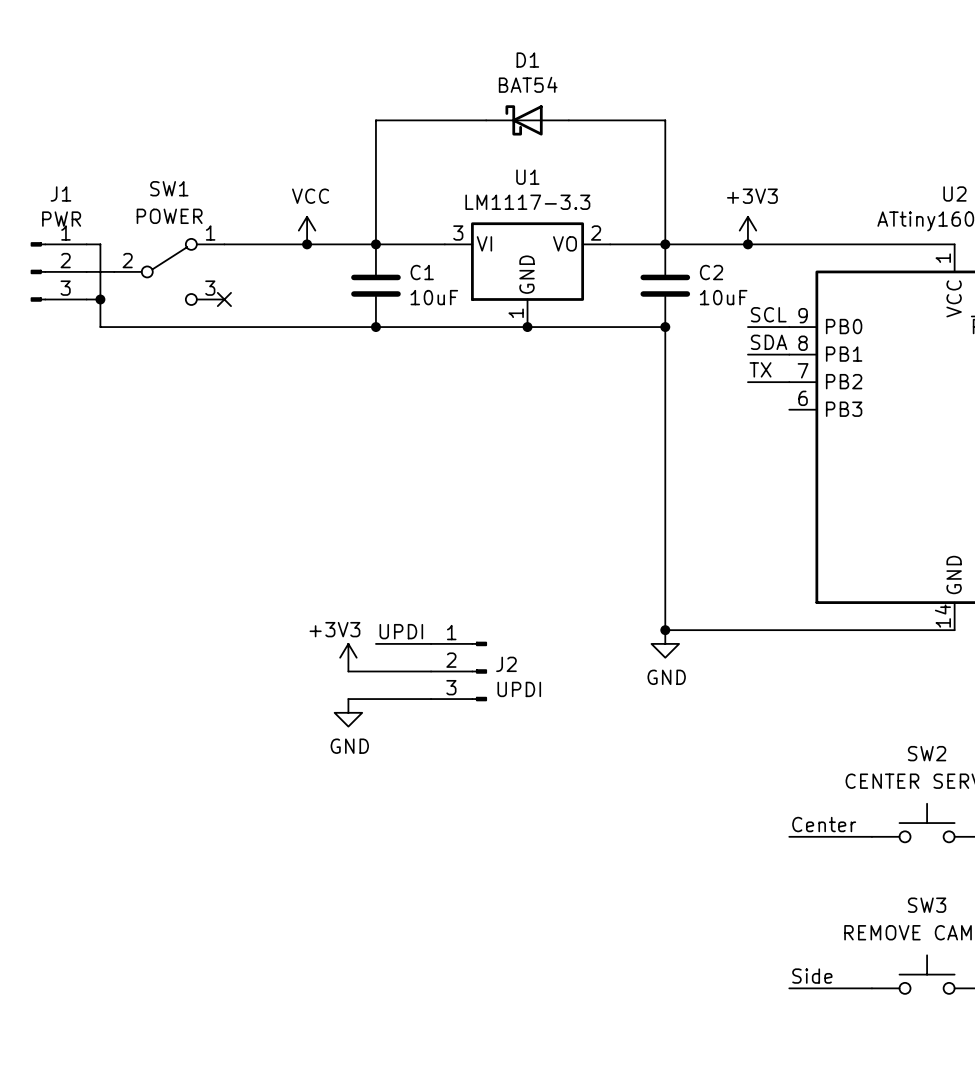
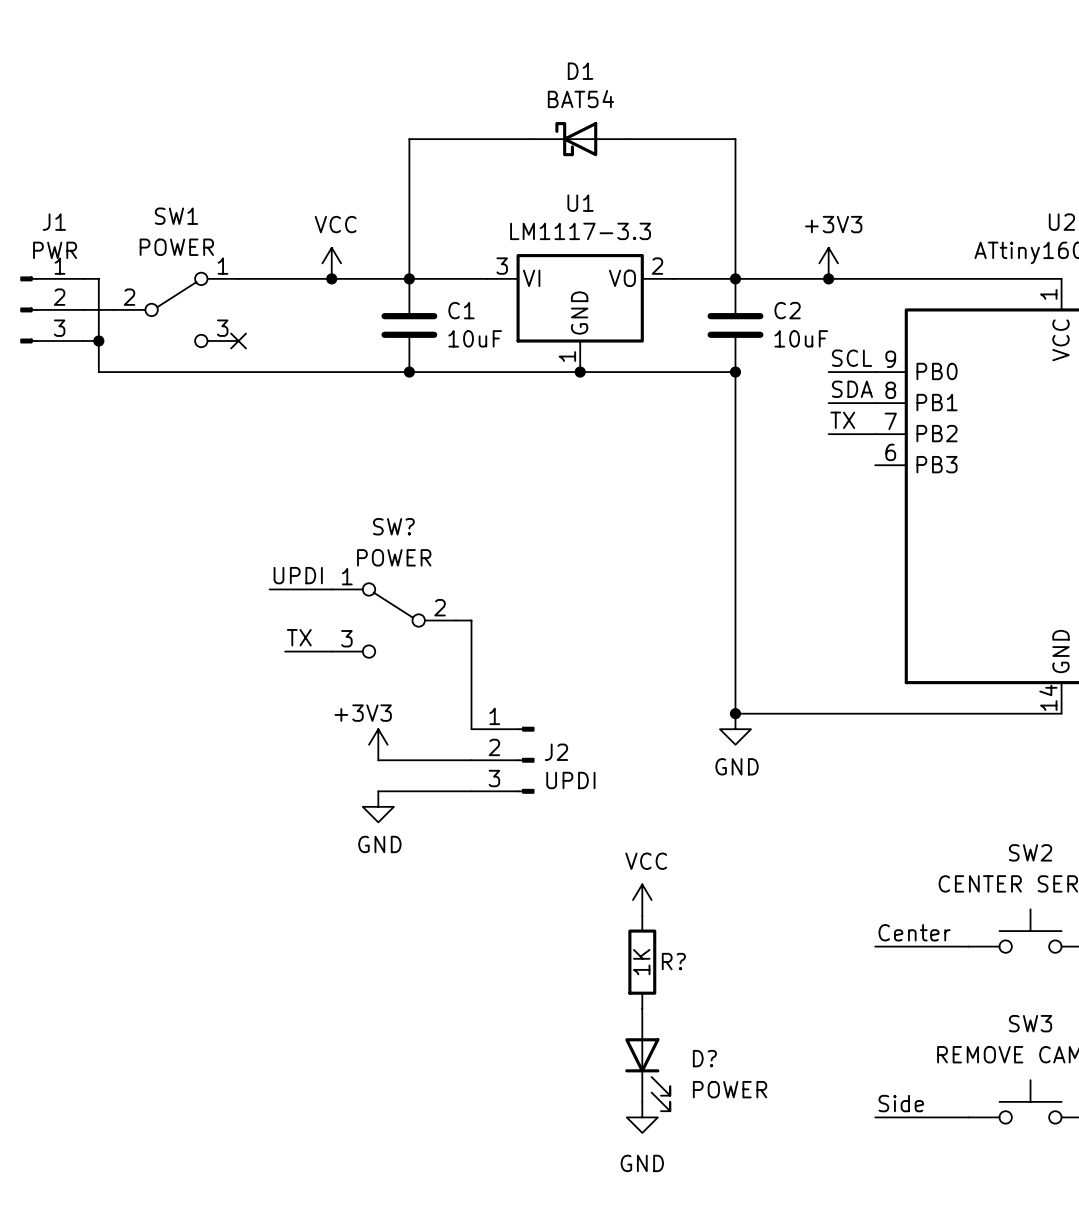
wire: none -> (269, 589) (331, 589)
SW?: none -> POWER (393, 620)
label: none -> TX (299, 637)
wire: none -> (285, 651) (331, 651)
label position: UPDI (401, 631) -> UPDI (298, 575)
wire: (375, 643) (431, 643) -> (455, 620) (471, 620) (471, 729)
power symbol: none -> VCC (642, 900)
R?: none -> 1K (642, 962)
D?: none -> POWER (647, 1059)
power symbol: none -> GND (642, 1117)

